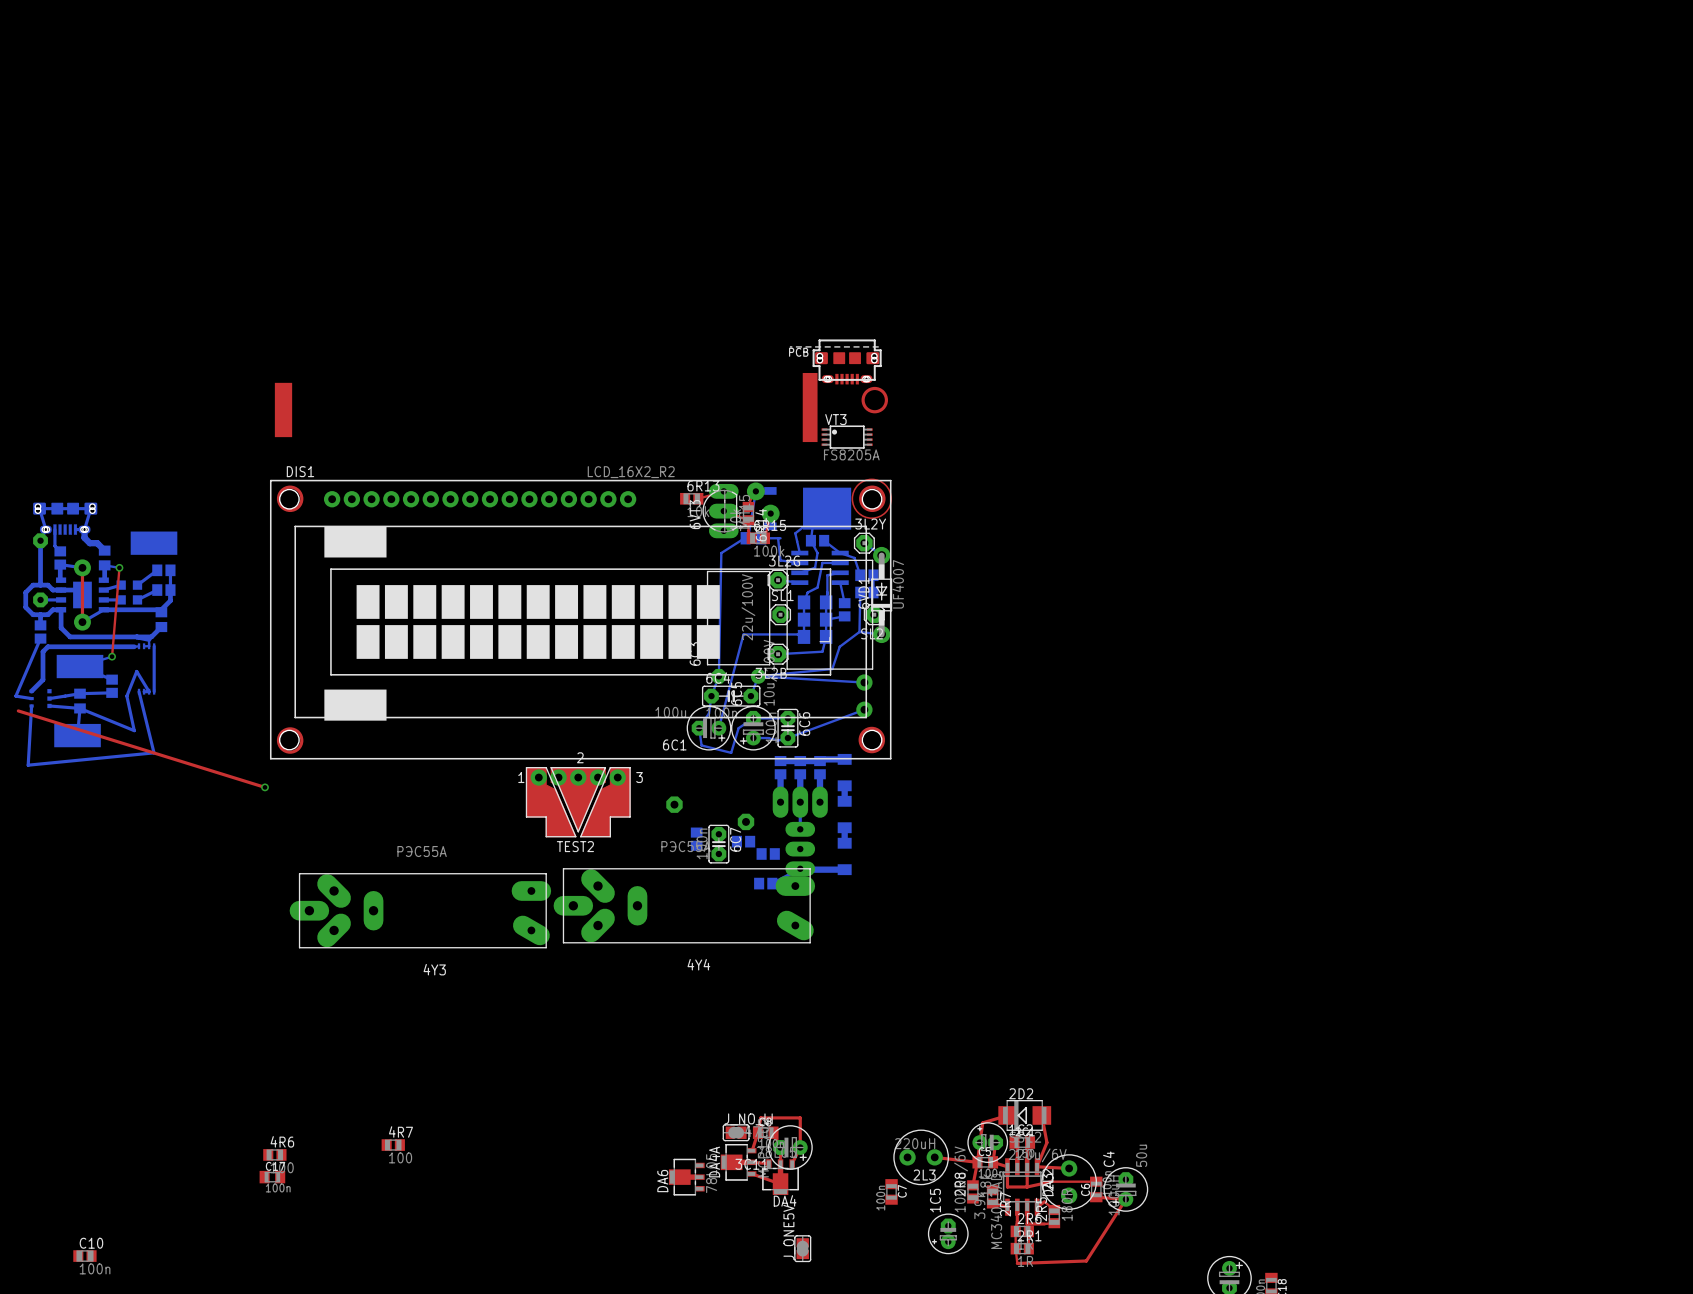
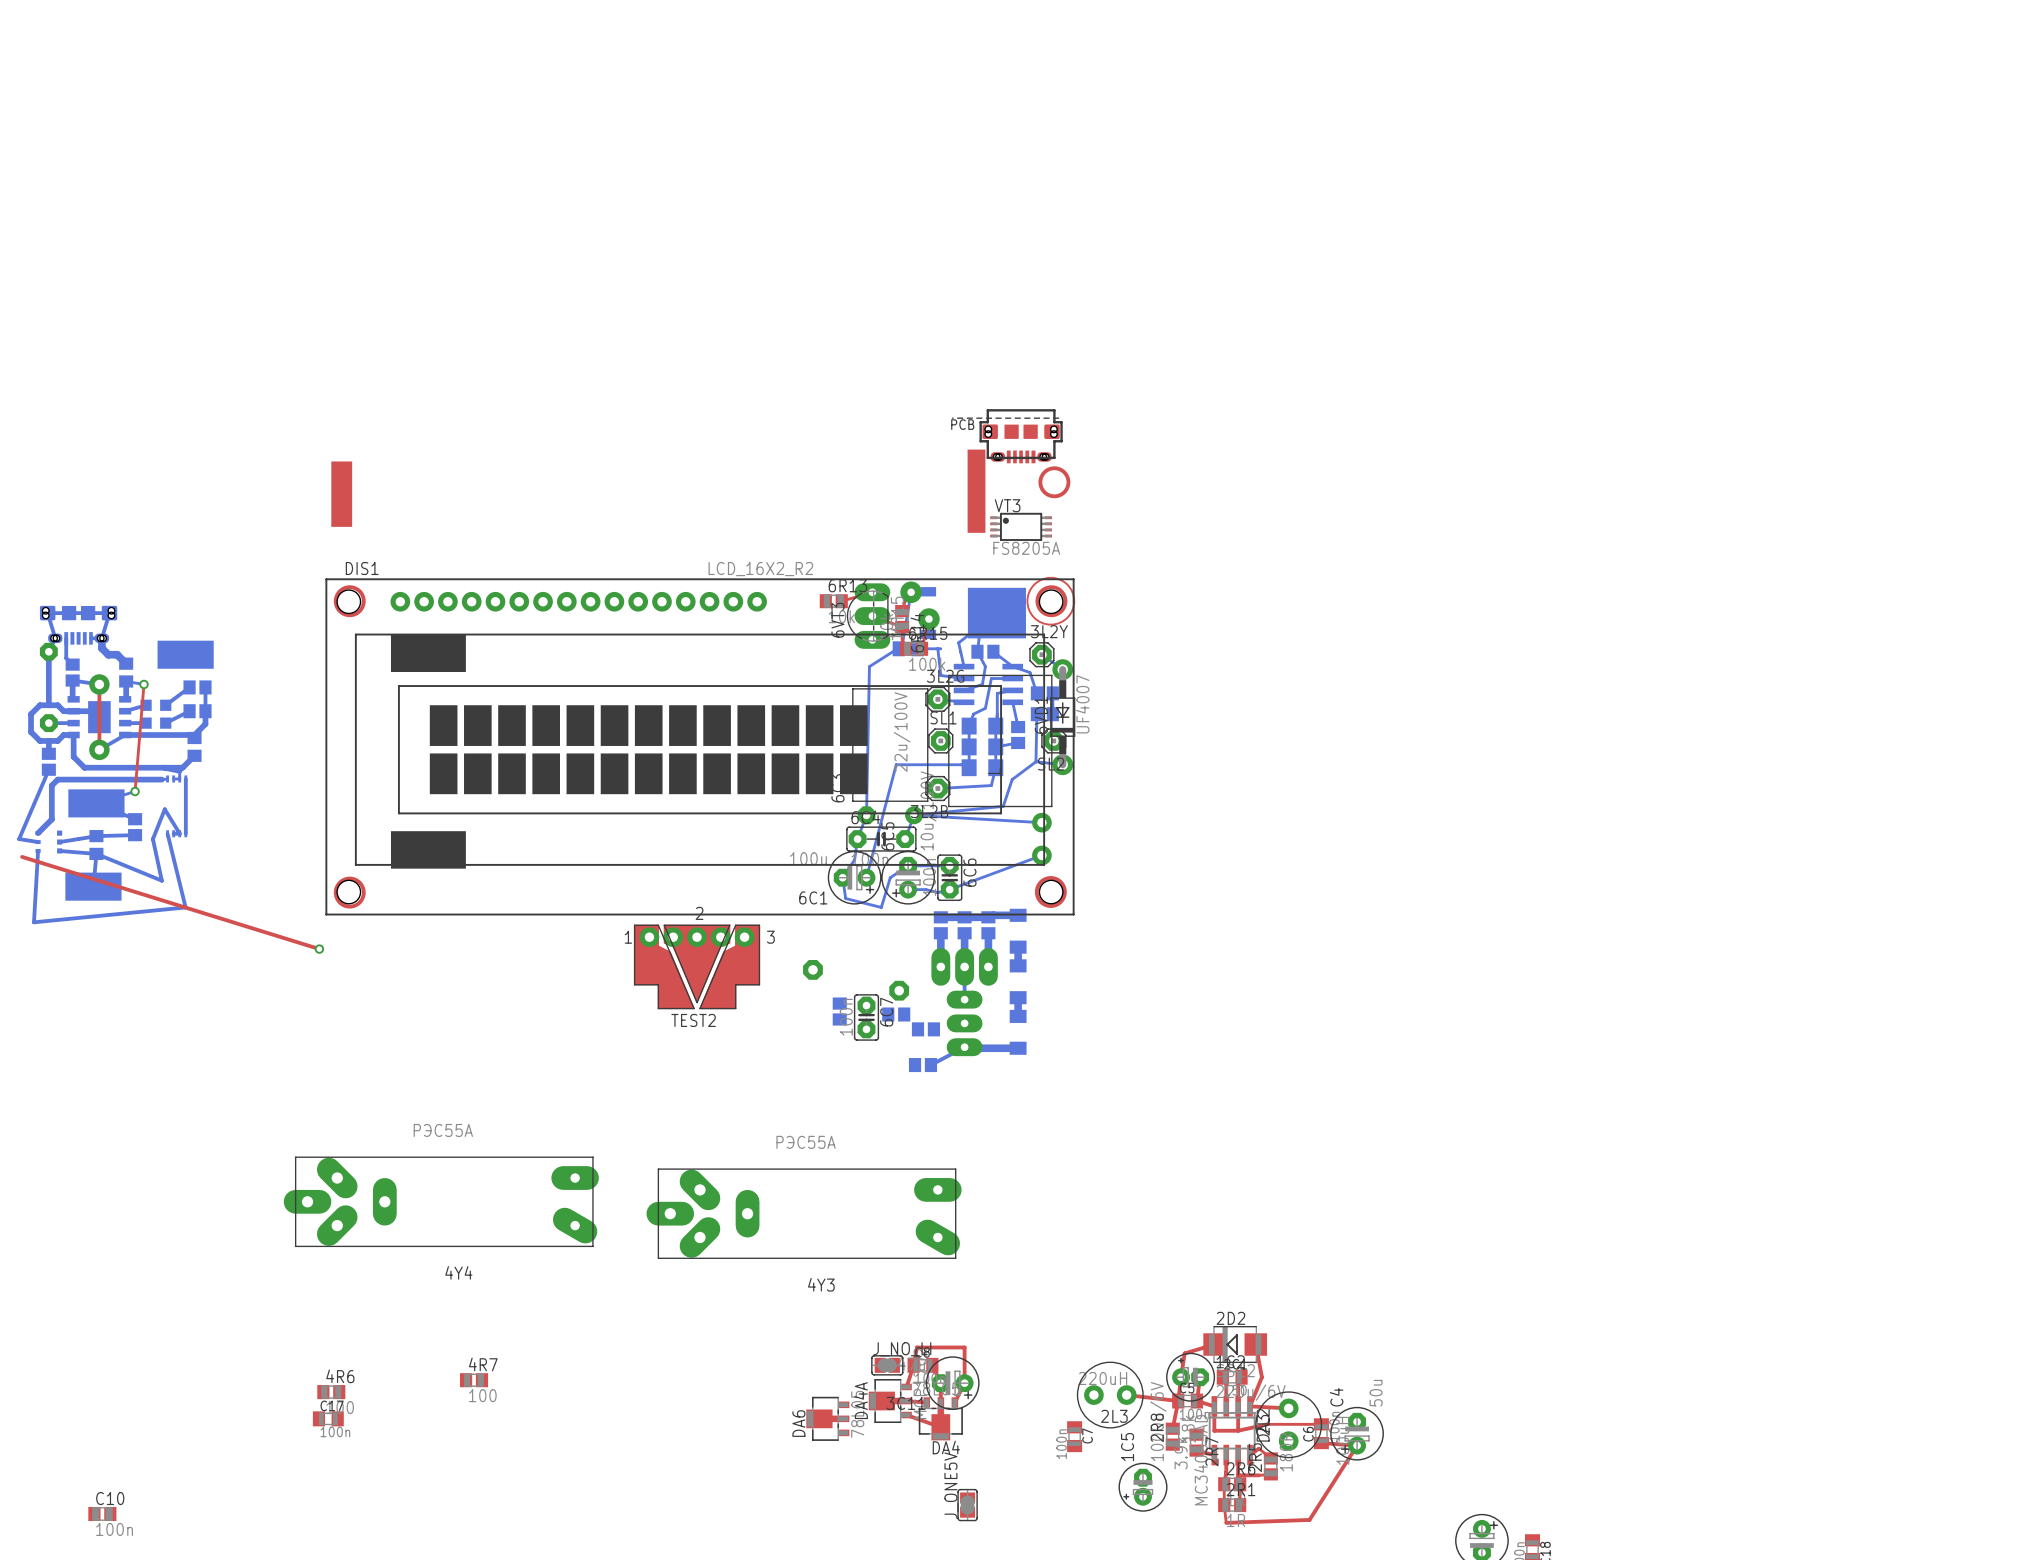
4Y4 footprint: [553, 868, 816, 944] -> [283, 1156, 599, 1247]
4Y3 position: (420, 910) -> (804, 1213)

